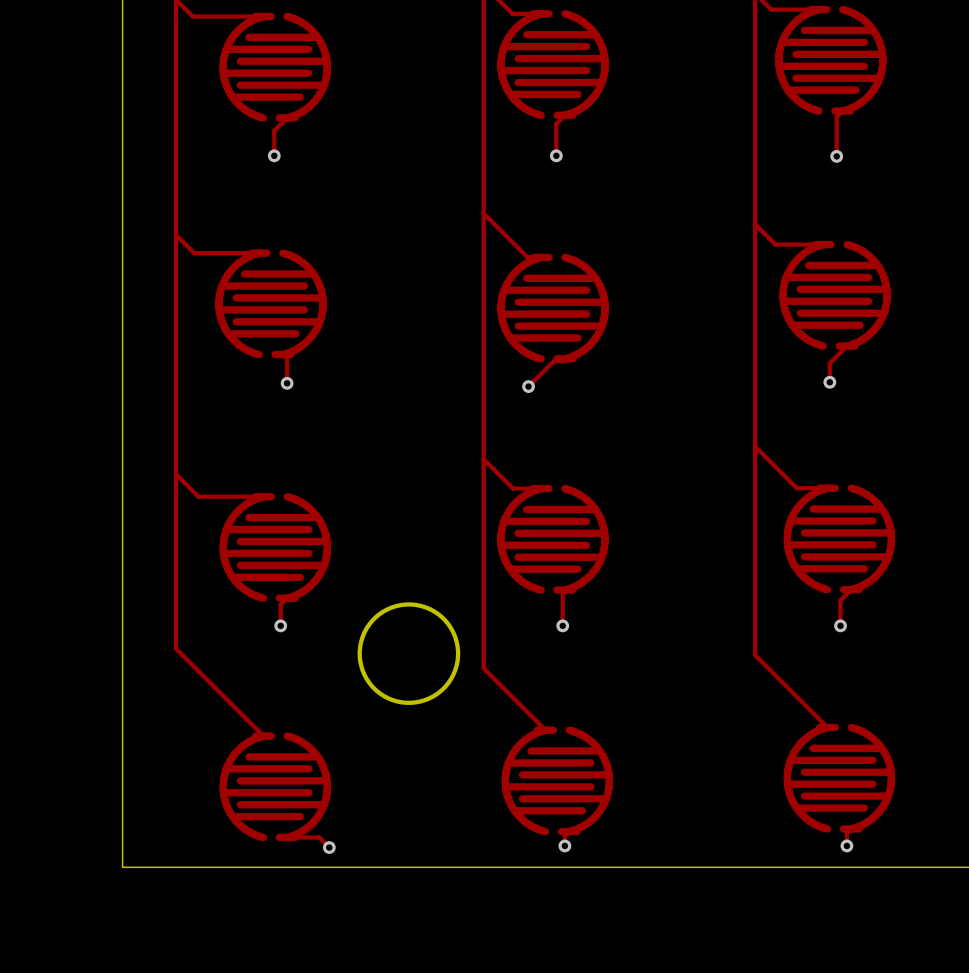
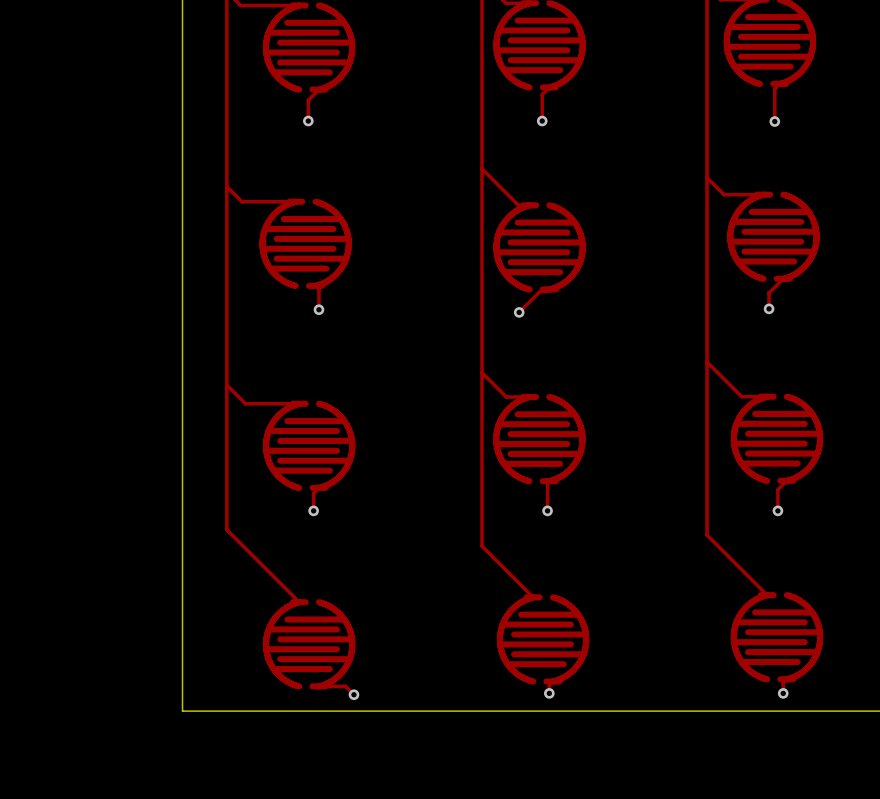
round board edge: [357, 602, 461, 705] -> none

